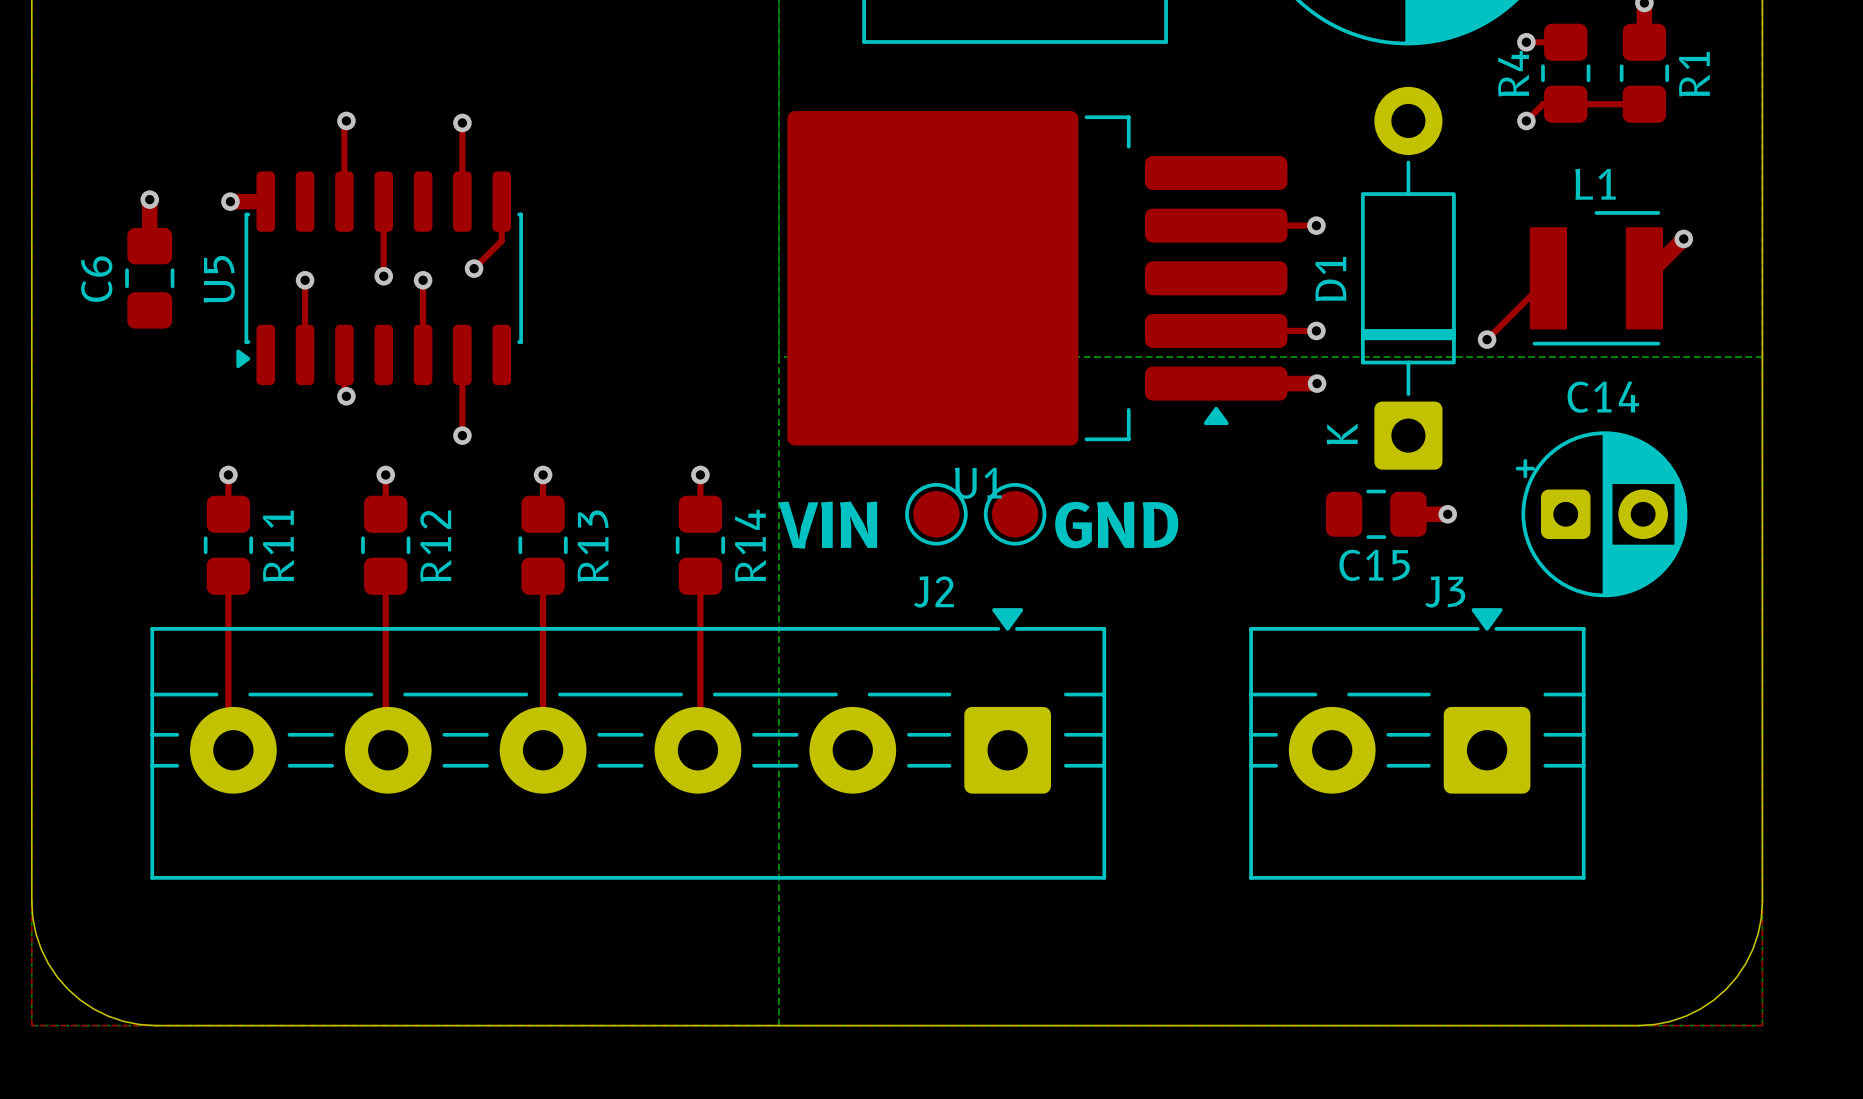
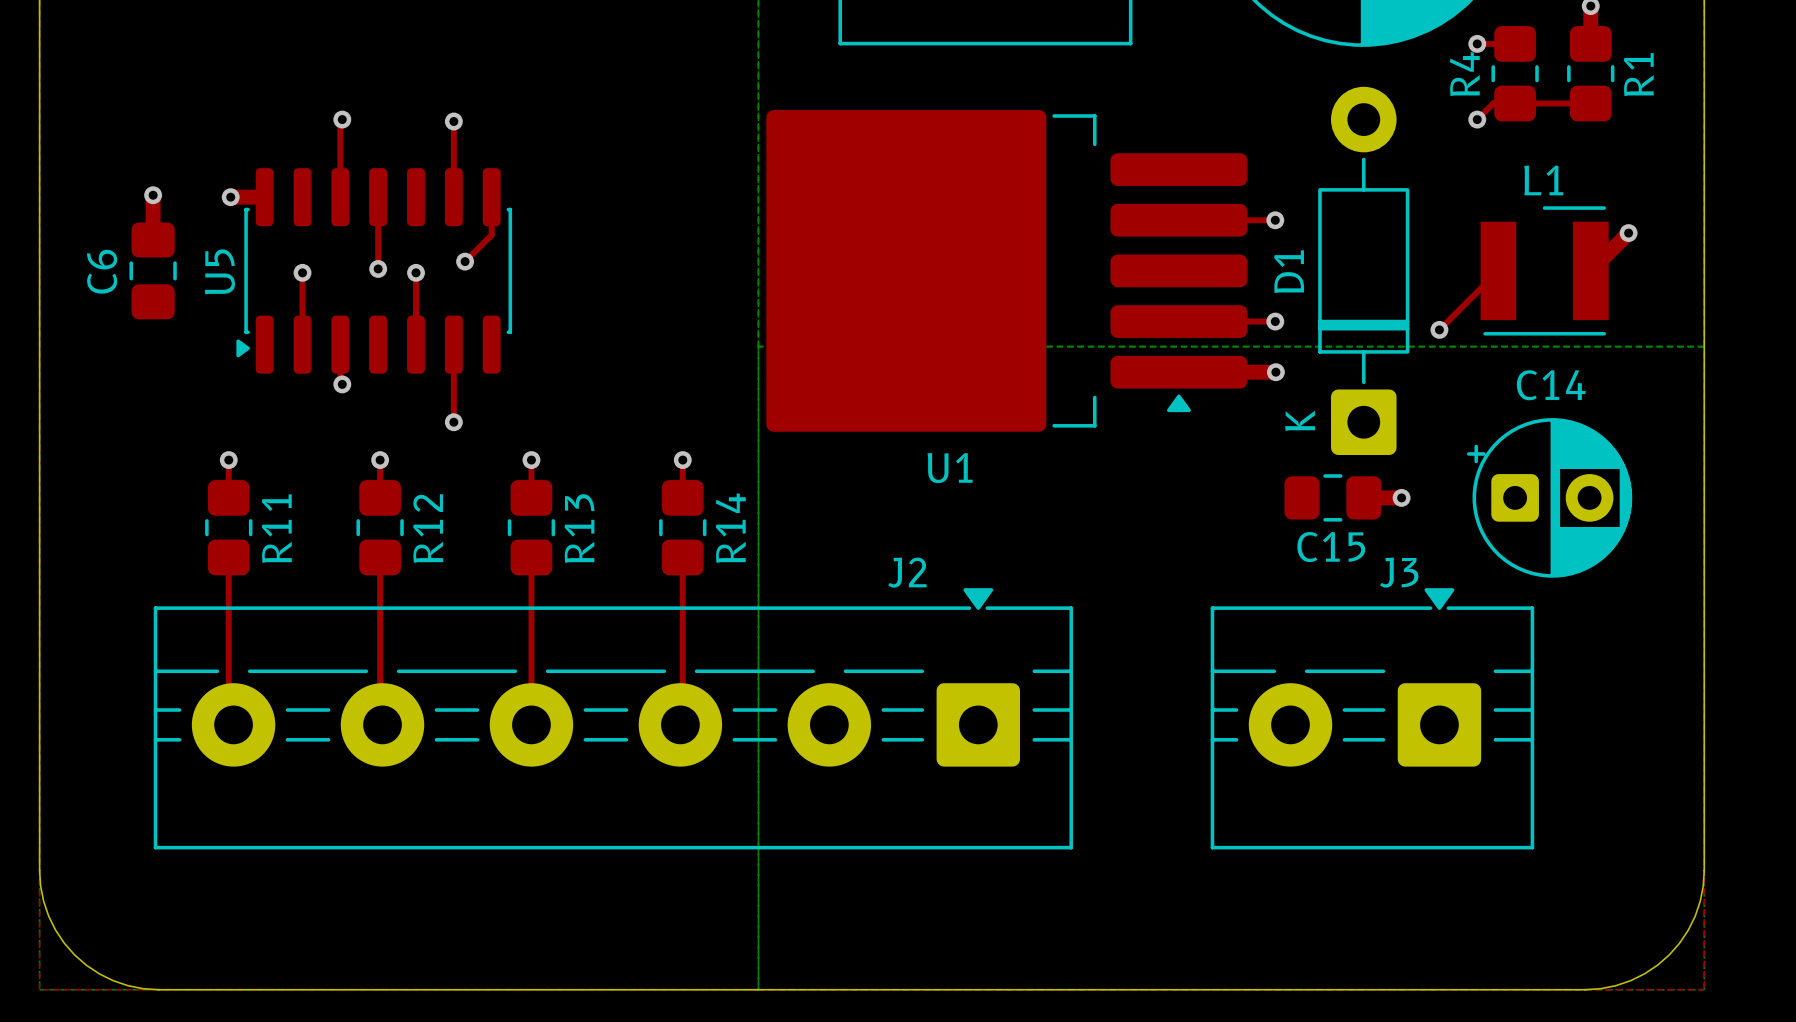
part: (936, 514) -> none
part: (1015, 514) -> none
text: GND (1116, 524) -> none
text: VIN (827, 525) -> none

